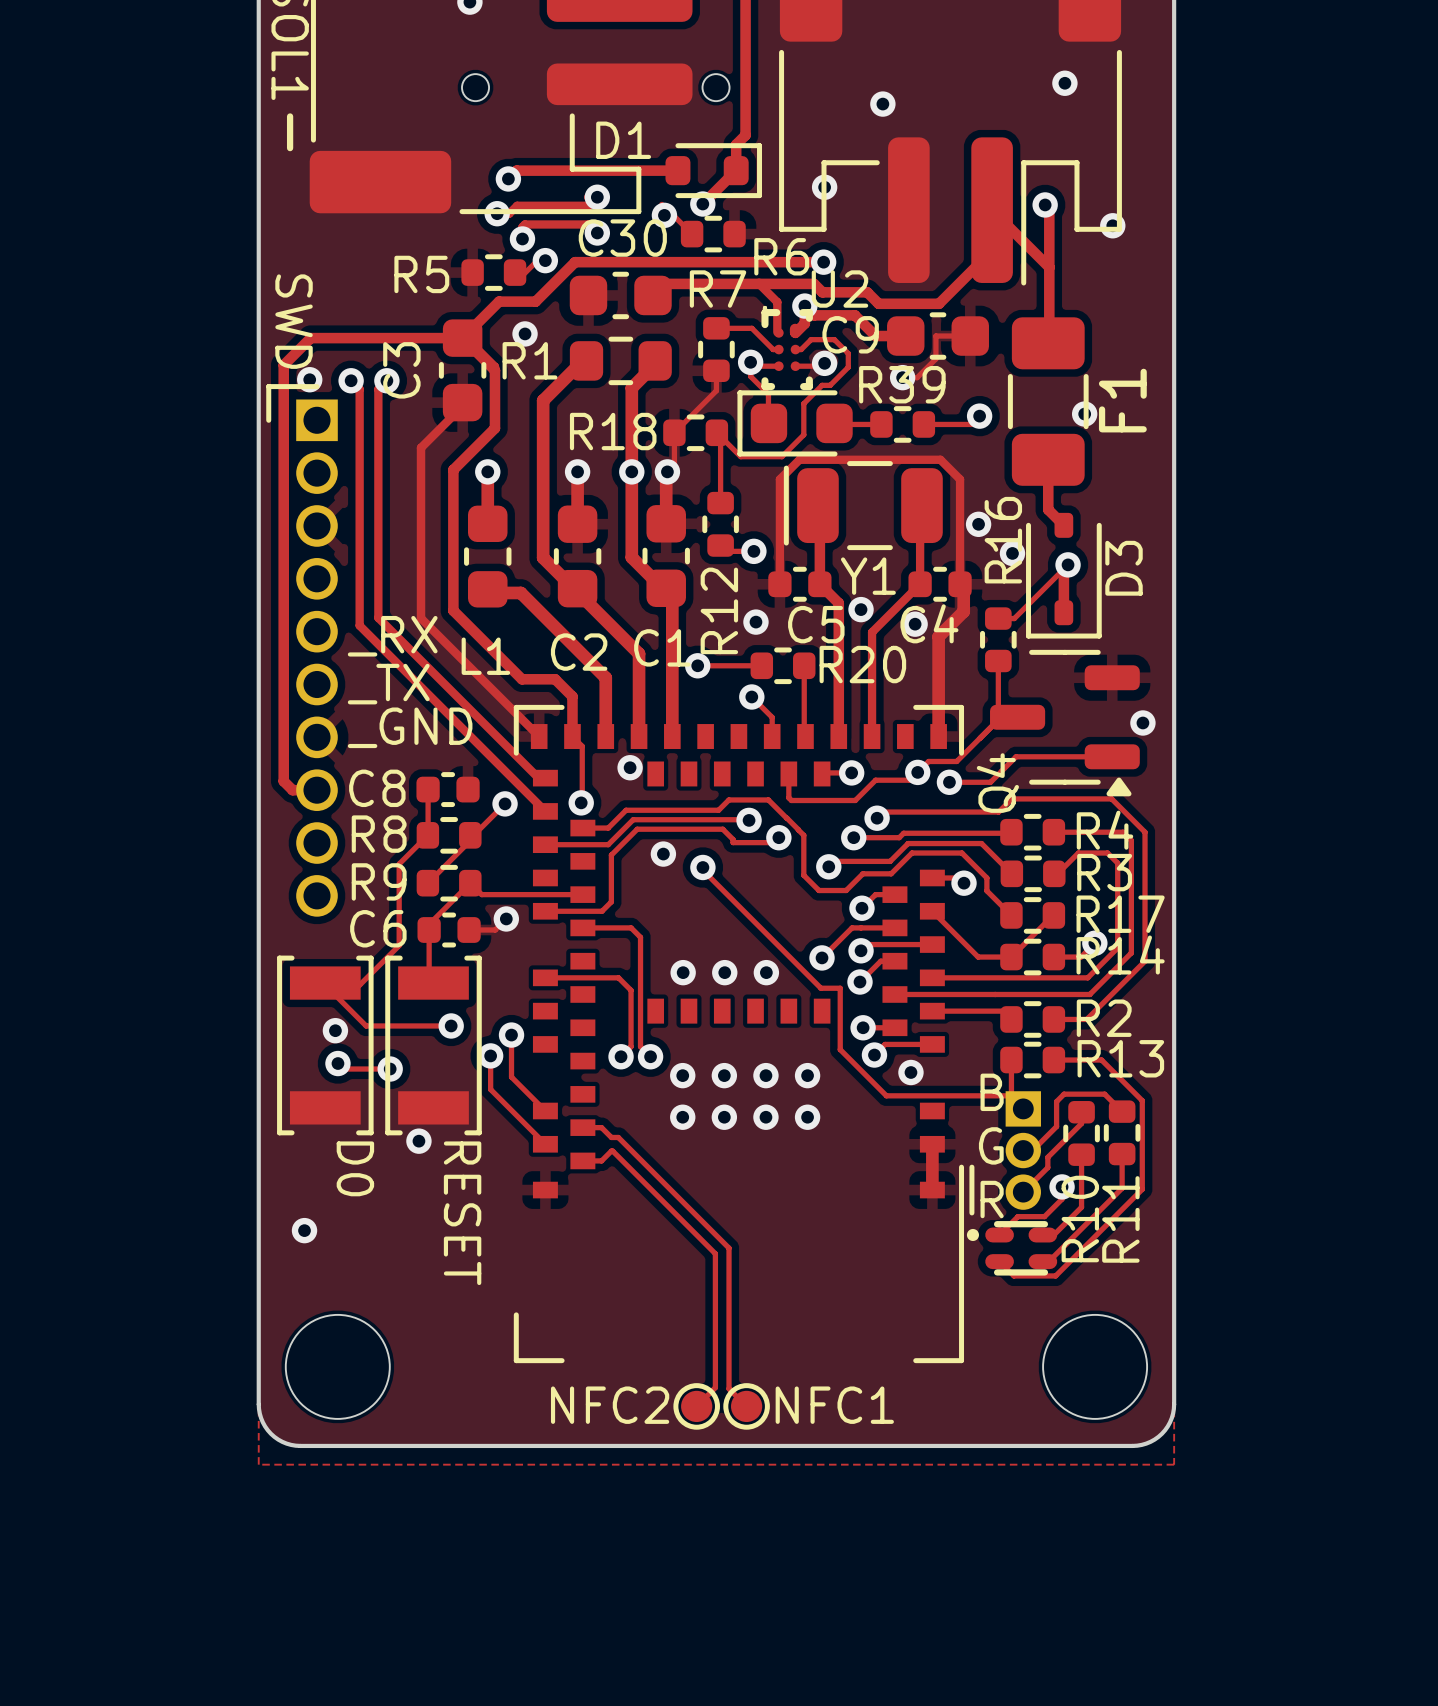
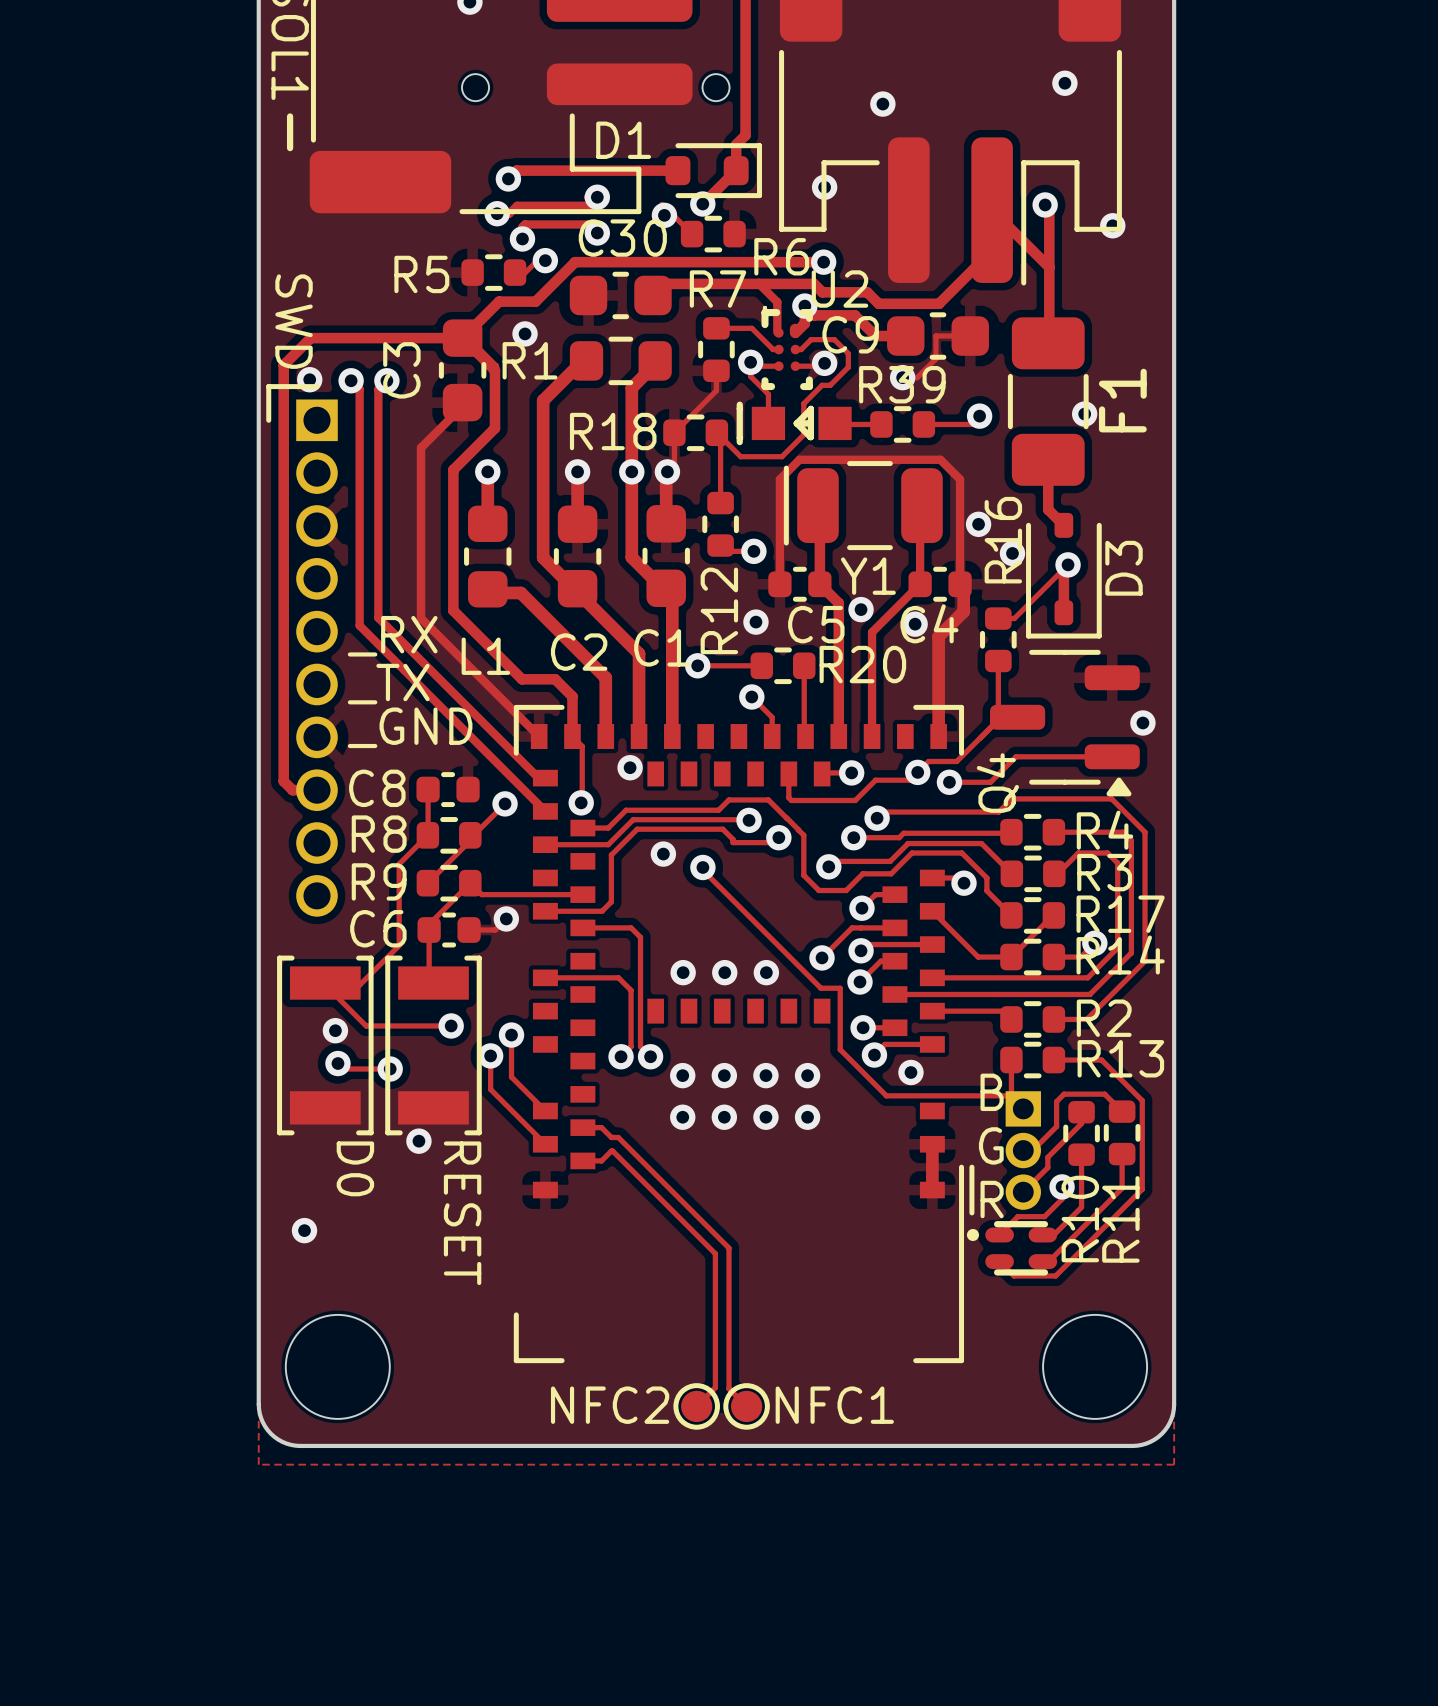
part footprint: [737, 390, 853, 457] -> [736, 401, 852, 446]

